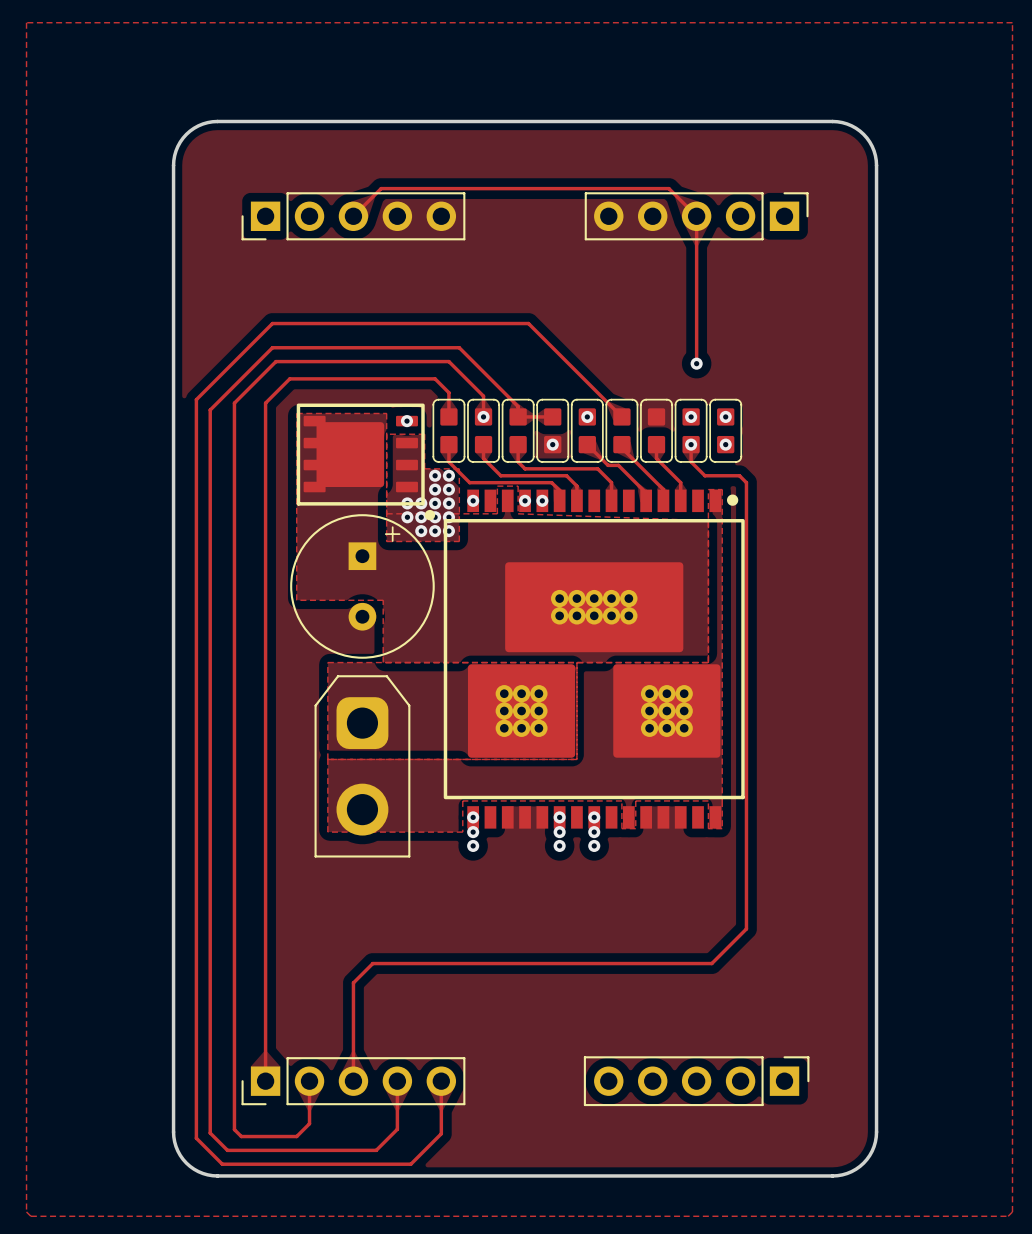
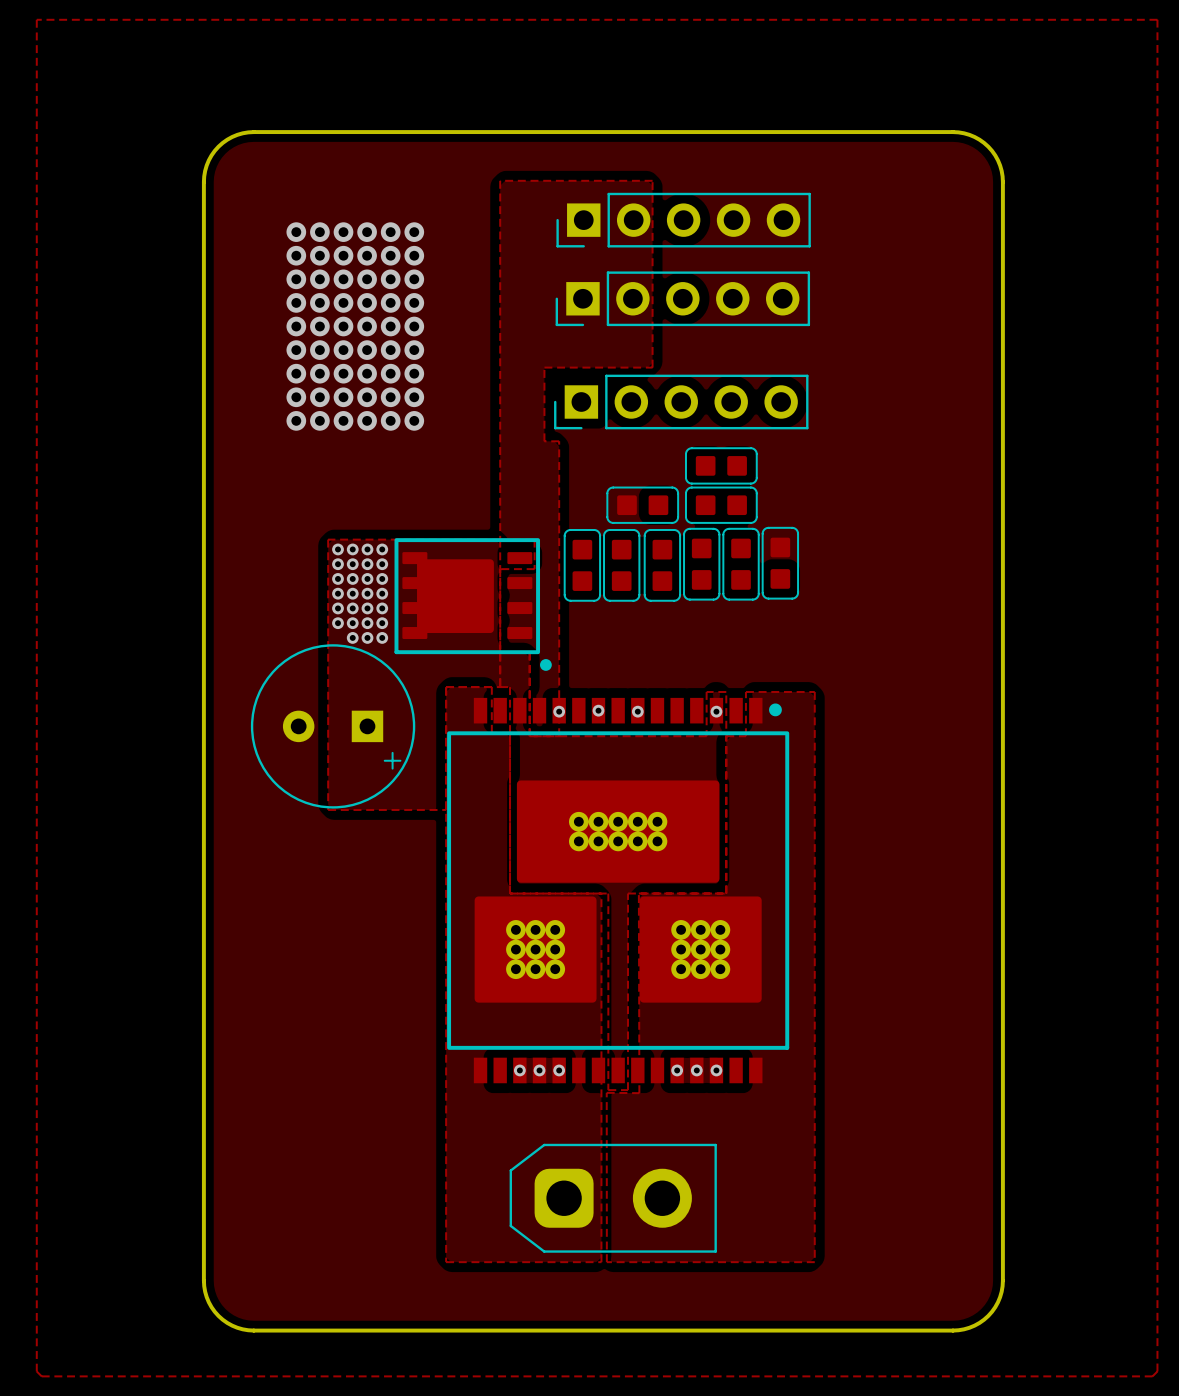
part: none -> (683, 220)
via: none -> (296, 232)
via: none -> (319, 232)
via: none -> (343, 232)
via: none -> (367, 232)
via: none -> (390, 232)
via: none -> (414, 232)
track: (353, 216) (381, 188) (668, 188) (696, 216) (696, 363) -> none
part: (353, 216) -> none
part: (696, 216) -> none
via: none -> (296, 255)
via: none -> (319, 255)
via: none -> (343, 255)
via: none -> (367, 255)
via: none -> (390, 255)
via: none -> (414, 255)
via: none -> (296, 279)
via: none -> (319, 279)
via: none -> (343, 279)
via: none -> (367, 279)
via: none -> (390, 279)
via: none -> (414, 279)
part: none -> (682, 298)
via: none -> (296, 302)
via: none -> (319, 302)
via: none -> (343, 302)
via: none -> (367, 302)
via: none -> (390, 302)
via: none -> (414, 302)
via: none -> (296, 326)
via: none -> (319, 326)
via: none -> (343, 326)
via: none -> (367, 326)
via: none -> (390, 326)
via: none -> (414, 326)
via: none -> (296, 350)
via: none -> (319, 350)
via: none -> (343, 350)
via: none -> (367, 350)
via: none -> (390, 350)
via: none -> (414, 350)
via: none -> (296, 373)
via: none -> (319, 373)
via: none -> (343, 373)
via: none -> (367, 373)
via: none -> (390, 373)
via: none -> (414, 373)
via: none -> (296, 397)
via: none -> (319, 397)
via: none -> (343, 397)
via: none -> (367, 397)
via: none -> (390, 397)
via: none -> (414, 397)
part: none -> (681, 402)
via: (696, 363) -> none
via: none -> (296, 420)
via: none -> (319, 420)
via: none -> (343, 420)
via: none -> (367, 420)
via: none -> (390, 420)
via: none -> (414, 420)
part: none -> (721, 465)
track: (448, 416) (448, 392) (435, 378) (289, 378) (265, 403) (265, 1081) -> none
track: (483, 416) (483, 396) (448, 361) (275, 361) (234, 403) (234, 1129) (241, 1136) (296, 1136) (309, 1123) (309, 1081) -> none
via: (483, 416) -> none
track: (552, 416) (518, 416) (518, 406) (459, 347) (272, 347) (210, 410) (210, 1133) (227, 1150) (376, 1150) (397, 1129) (397, 1081) -> none
via: (587, 416) -> none
track: (621, 416) (528, 323) (272, 323) (196, 399) (196, 1138) (222, 1164) (410, 1164) (441, 1133) (441, 1081) -> none
via: (691, 416) -> none
via: (725, 416) -> none
via: (406, 421) -> none
part: (448, 430) -> none
part: (483, 430) -> none
part: (518, 430) -> none
part: (552, 430) -> none
part: (587, 430) -> none
part: (621, 430) -> none
part: (656, 430) -> none
part: (691, 430) -> none
part: (725, 430) -> none
zone outline: (386, 434) (424, 434) (424, 468) (459, 468) (459, 541) (386, 541) (386, 413) (296, 413) (296, 600) (383, 600) (383, 662) -> none
track: (448, 444) (448, 461) (469, 482) (551, 482) (559, 490) (559, 500) -> none
track: (483, 444) (483, 458) (500, 475) (566, 475) (576, 486) (576, 500) -> none
track: (518, 444) (518, 461) (525, 468) (597, 468) (611, 482) (611, 500) -> none
via: (552, 444) -> none
track: (587, 444) (608, 465) (618, 465) (646, 493) (646, 500) -> none
track: (621, 444) (621, 448) (663, 489) (663, 500) -> none
track: (656, 444) (656, 458) (680, 482) (680, 500) -> none
track: (691, 444) (691, 461) (704, 475) (739, 475) (746, 482) (746, 928) (711, 963) (372, 963) (353, 982) (353, 1081) -> none
via: (691, 444) -> none
via: (725, 444) -> none
part: none -> (642, 505)
part: none -> (721, 505)
part position: (365, 461) -> (473, 604)
via: (435, 475) -> none
via: (448, 475) -> none
via: none -> (337, 549)
via: none -> (352, 549)
via: none -> (367, 549)
via: none -> (382, 549)
via: (435, 489) -> none
via: (448, 489) -> none
zone outline: (708, 489) (708, 662) (327, 662) (327, 832) (462, 832) (462, 800) (621, 800) (621, 828) (635, 828) (635, 800) (708, 800) (708, 828) (722, 828) (722, 489) (708, 489) -> none
via: (473, 500) -> none
via: (525, 500) -> none
via: (542, 500) -> none
part: none -> (780, 563)
via: none -> (337, 564)
via: none -> (352, 564)
via: none -> (367, 564)
via: none -> (382, 564)
part: none -> (701, 564)
part: none -> (741, 564)
part: none -> (582, 565)
part: none -> (621, 565)
part: none -> (662, 565)
via: (407, 503) -> none
via: (421, 503) -> none
via: (435, 503) -> none
via: (448, 503) -> none
zone outline: none -> (500, 569) (534, 569) (534, 539) (328, 539) (328, 809) (446, 809)
zone outline: (386, 513) (497, 513) (497, 486) (518, 486) (518, 513) (708, 520) -> none
via: none -> (337, 578)
via: none -> (352, 578)
via: none -> (367, 578)
via: none -> (382, 578)
via: (407, 517) -> none
via: (421, 517) -> none
via: (435, 517) -> none
via: (448, 517) -> none
via: none -> (337, 593)
via: none -> (352, 593)
via: none -> (367, 593)
via: none -> (382, 593)
via: (421, 531) -> none
via: (435, 531) -> none
via: (448, 531) -> none
via: none -> (337, 608)
via: none -> (352, 608)
via: none -> (367, 608)
via: none -> (382, 608)
via: none -> (337, 623)
via: none -> (352, 623)
via: none -> (367, 623)
via: none -> (382, 623)
via: none -> (352, 637)
via: none -> (367, 637)
via: none -> (382, 637)
zone outline: none -> (500, 652) (529, 652) (529, 736) (706, 736) (706, 691) (726, 691) (726, 893) (627, 893) (627, 1090) (608, 1090) (608, 893) (510, 893) (510, 687) (446, 687) (446, 1262) (601, 1262) (601, 893)
part: (362, 586) -> none
zone outline: none -> (491, 687) (491, 732) (510, 732)
zone outline: none -> (500, 687) (500, 180) (652, 180) (652, 367) (544, 367) (544, 441) (559, 441) (559, 736)
via: none -> (598, 710)
via: none -> (559, 711)
via: none -> (637, 711)
via: none -> (716, 711)
part: none -> (333, 726)
zone outline: none -> (726, 736) (745, 736) (745, 691) (814, 691) (814, 1262) (606, 1262) (606, 1092) (639, 1093) (638, 893)
part position: (594, 659) -> (618, 890)
zone outline: (576, 662) (576, 759) (327, 759) -> none
part rotation: 0° (362, 766) -> 90° counterclockwise (613, 1198)
part position: (362, 766) -> (613, 1198)
via: (473, 817) -> none
via: (559, 817) -> none
via: (594, 817) -> none
via: (473, 832) -> none
via: (559, 832) -> none
via: (594, 832) -> none
via: (473, 845) -> none
via: (559, 845) -> none
via: (594, 845) -> none
via: none -> (519, 1070)
via: none -> (539, 1070)
via: none -> (559, 1070)
via: none -> (677, 1070)
via: none -> (696, 1070)
via: none -> (716, 1070)
part: (353, 1081) -> none
part: (696, 1081) -> none

